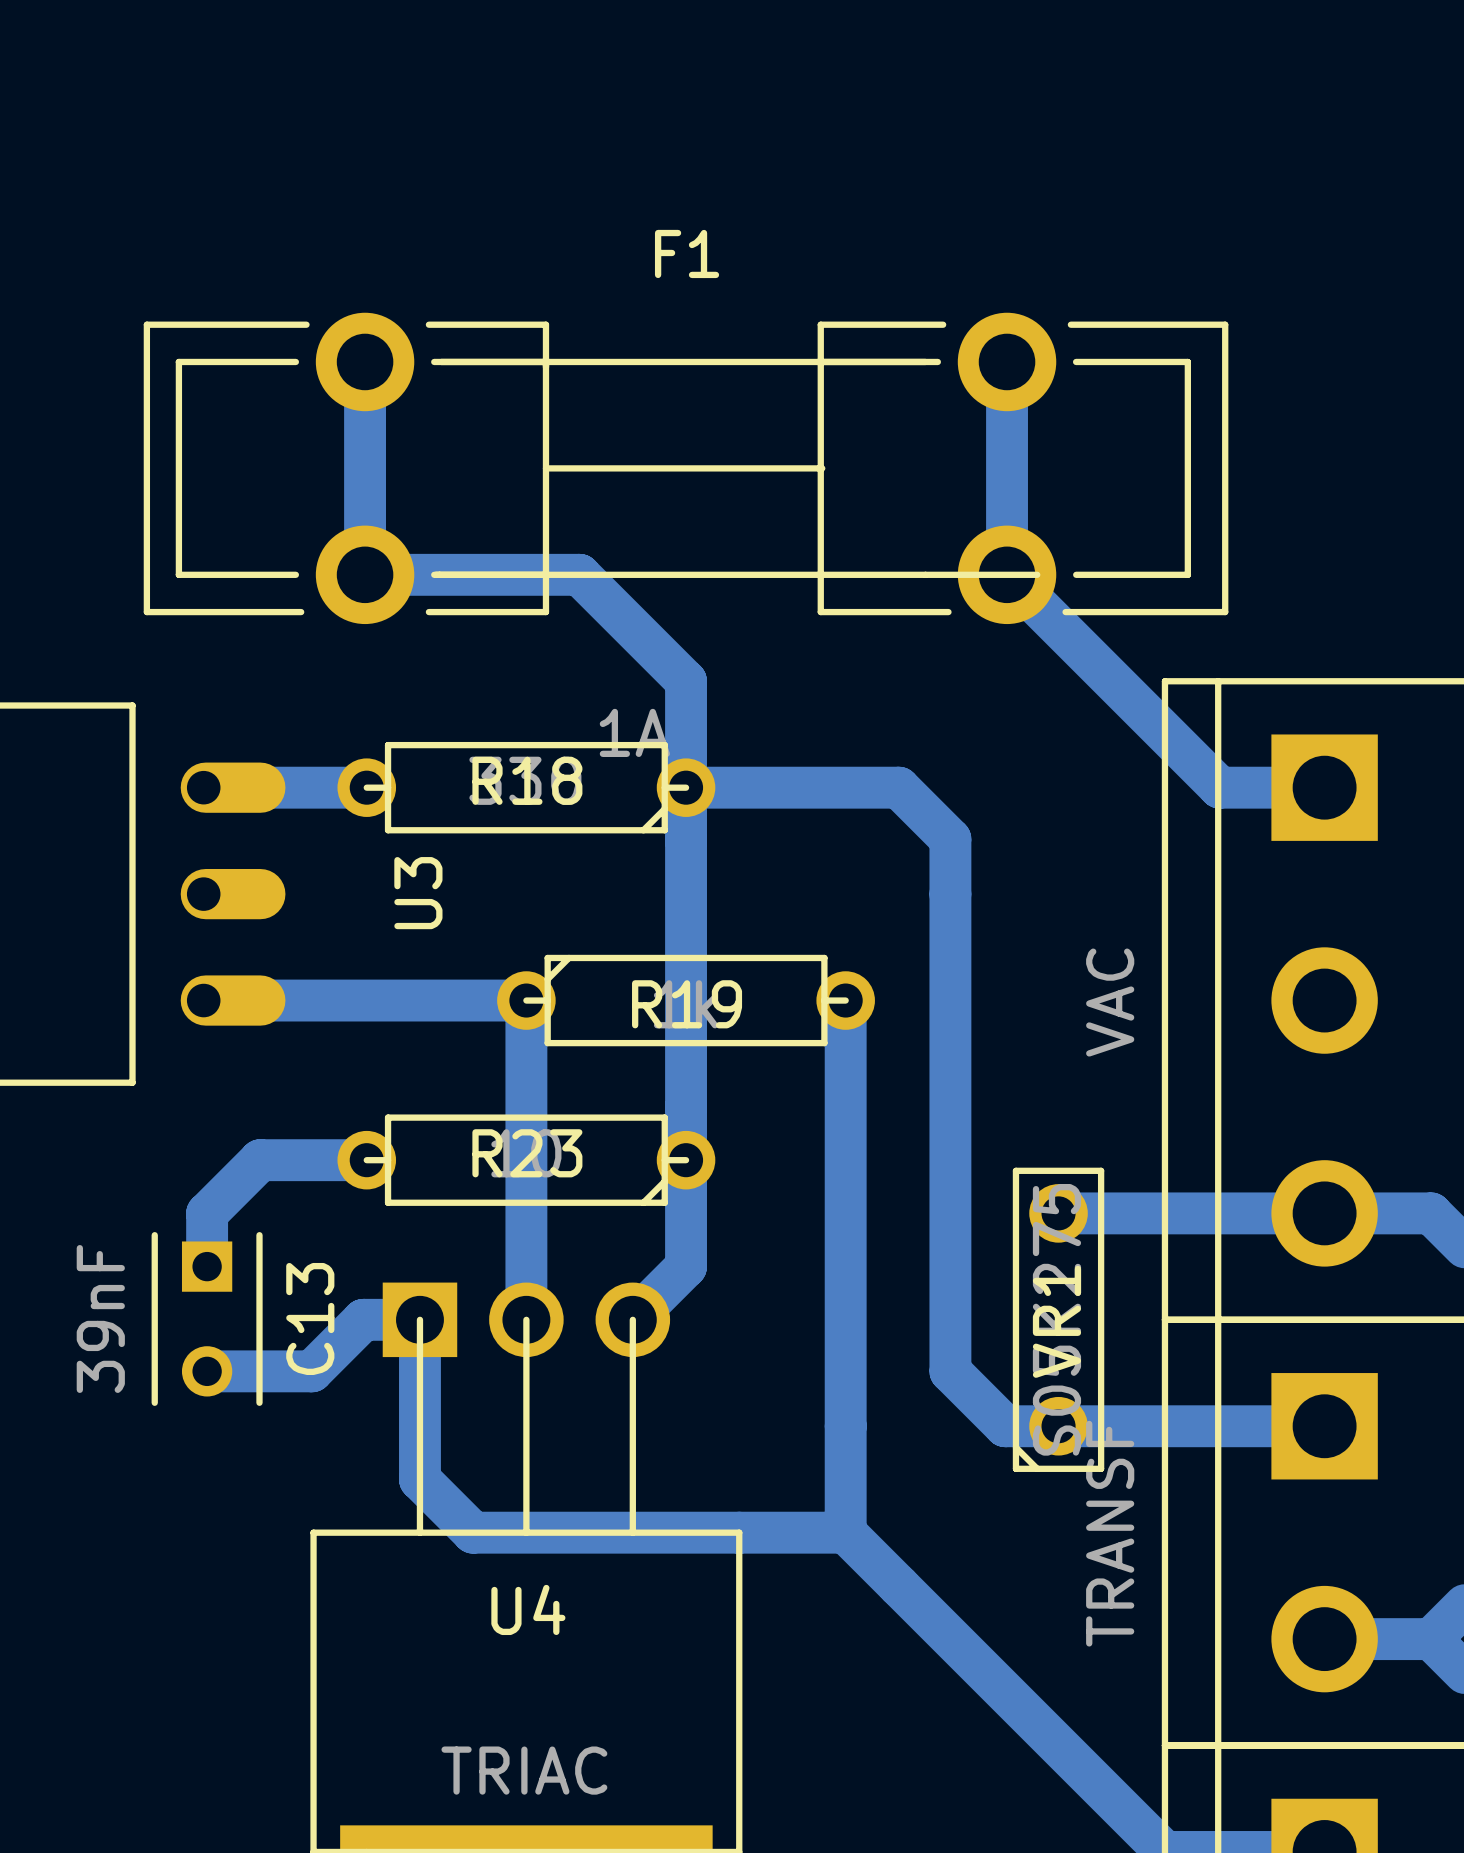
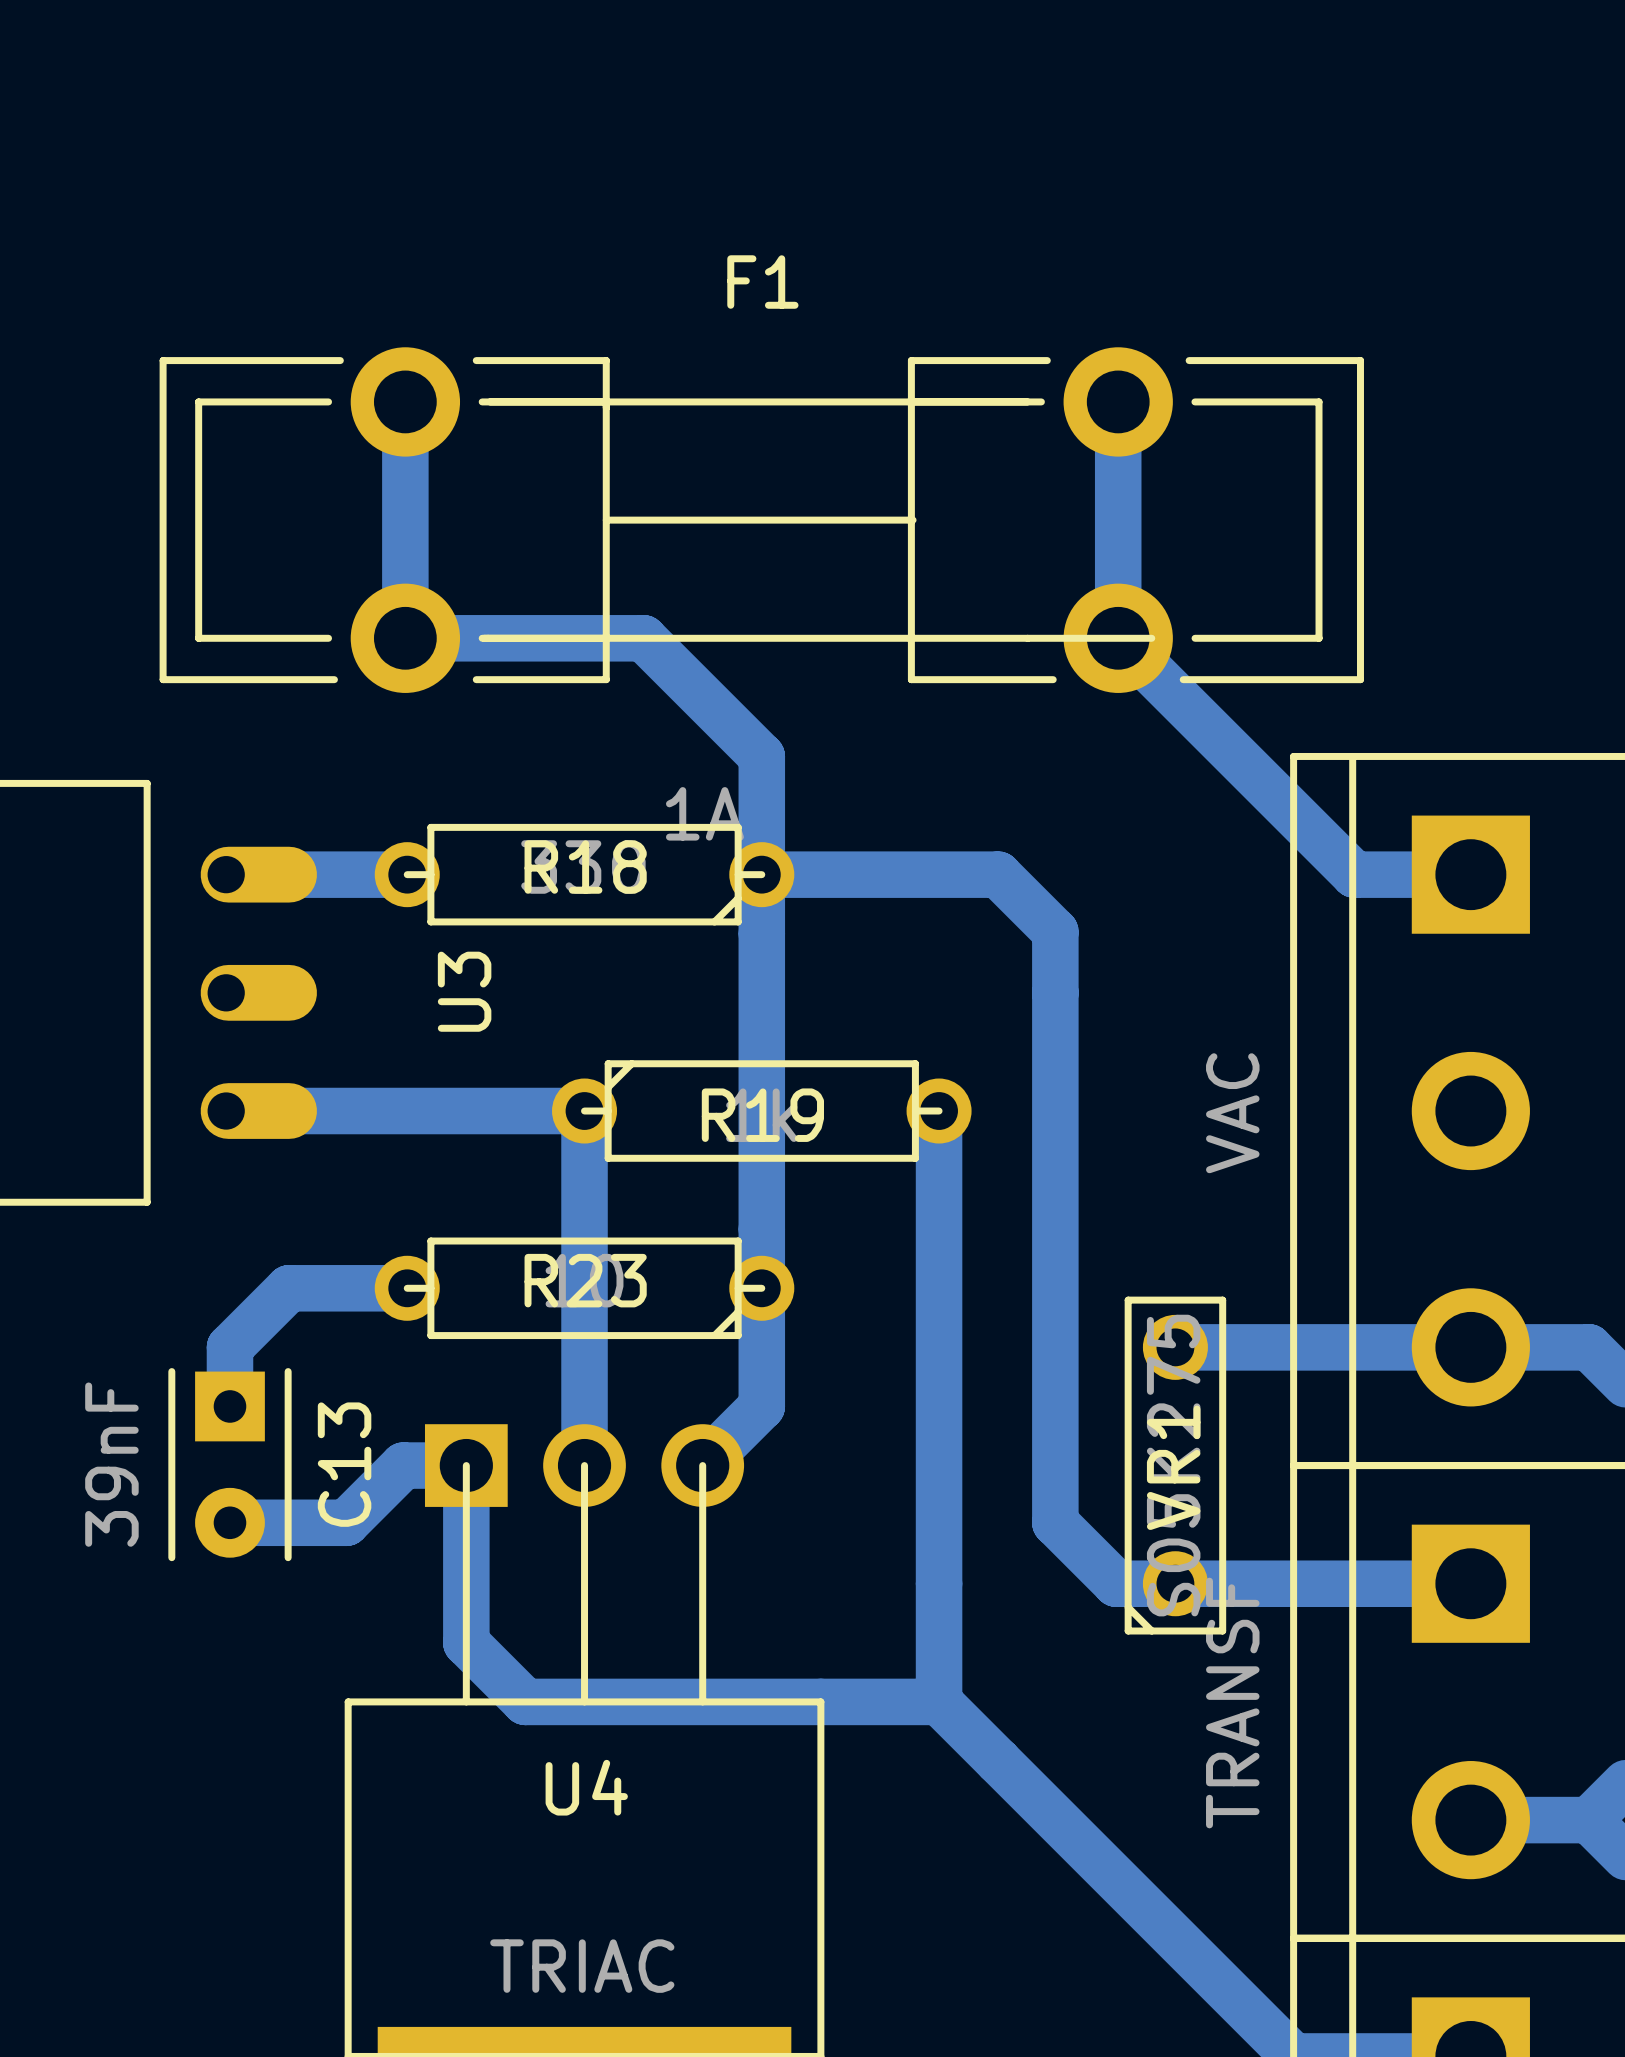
C13 footprint: [151, 1232, 263, 1406] -> [168, 1368, 292, 1562]

